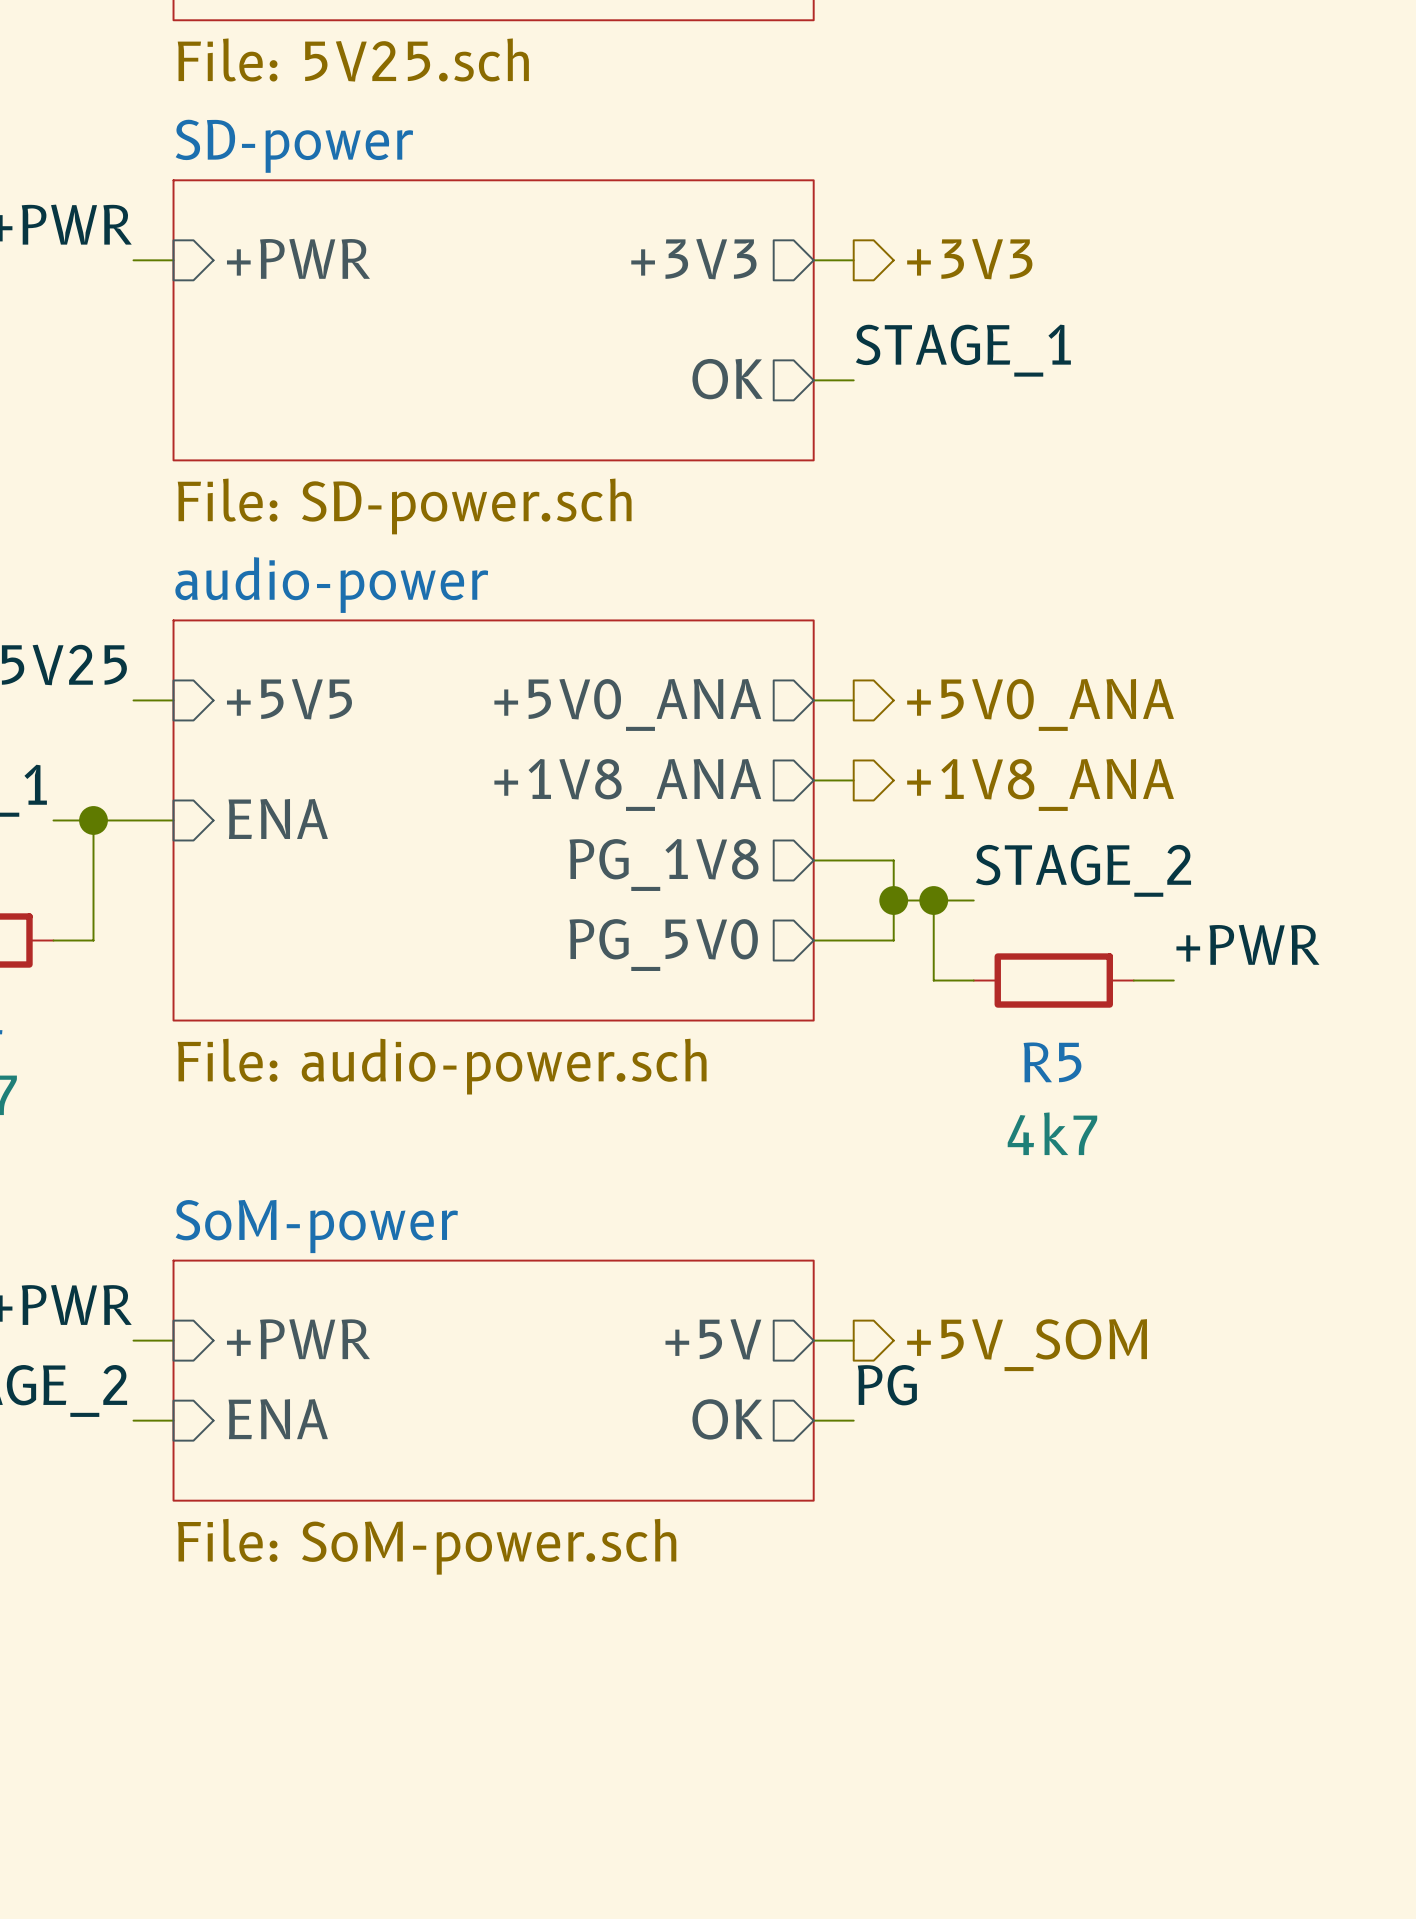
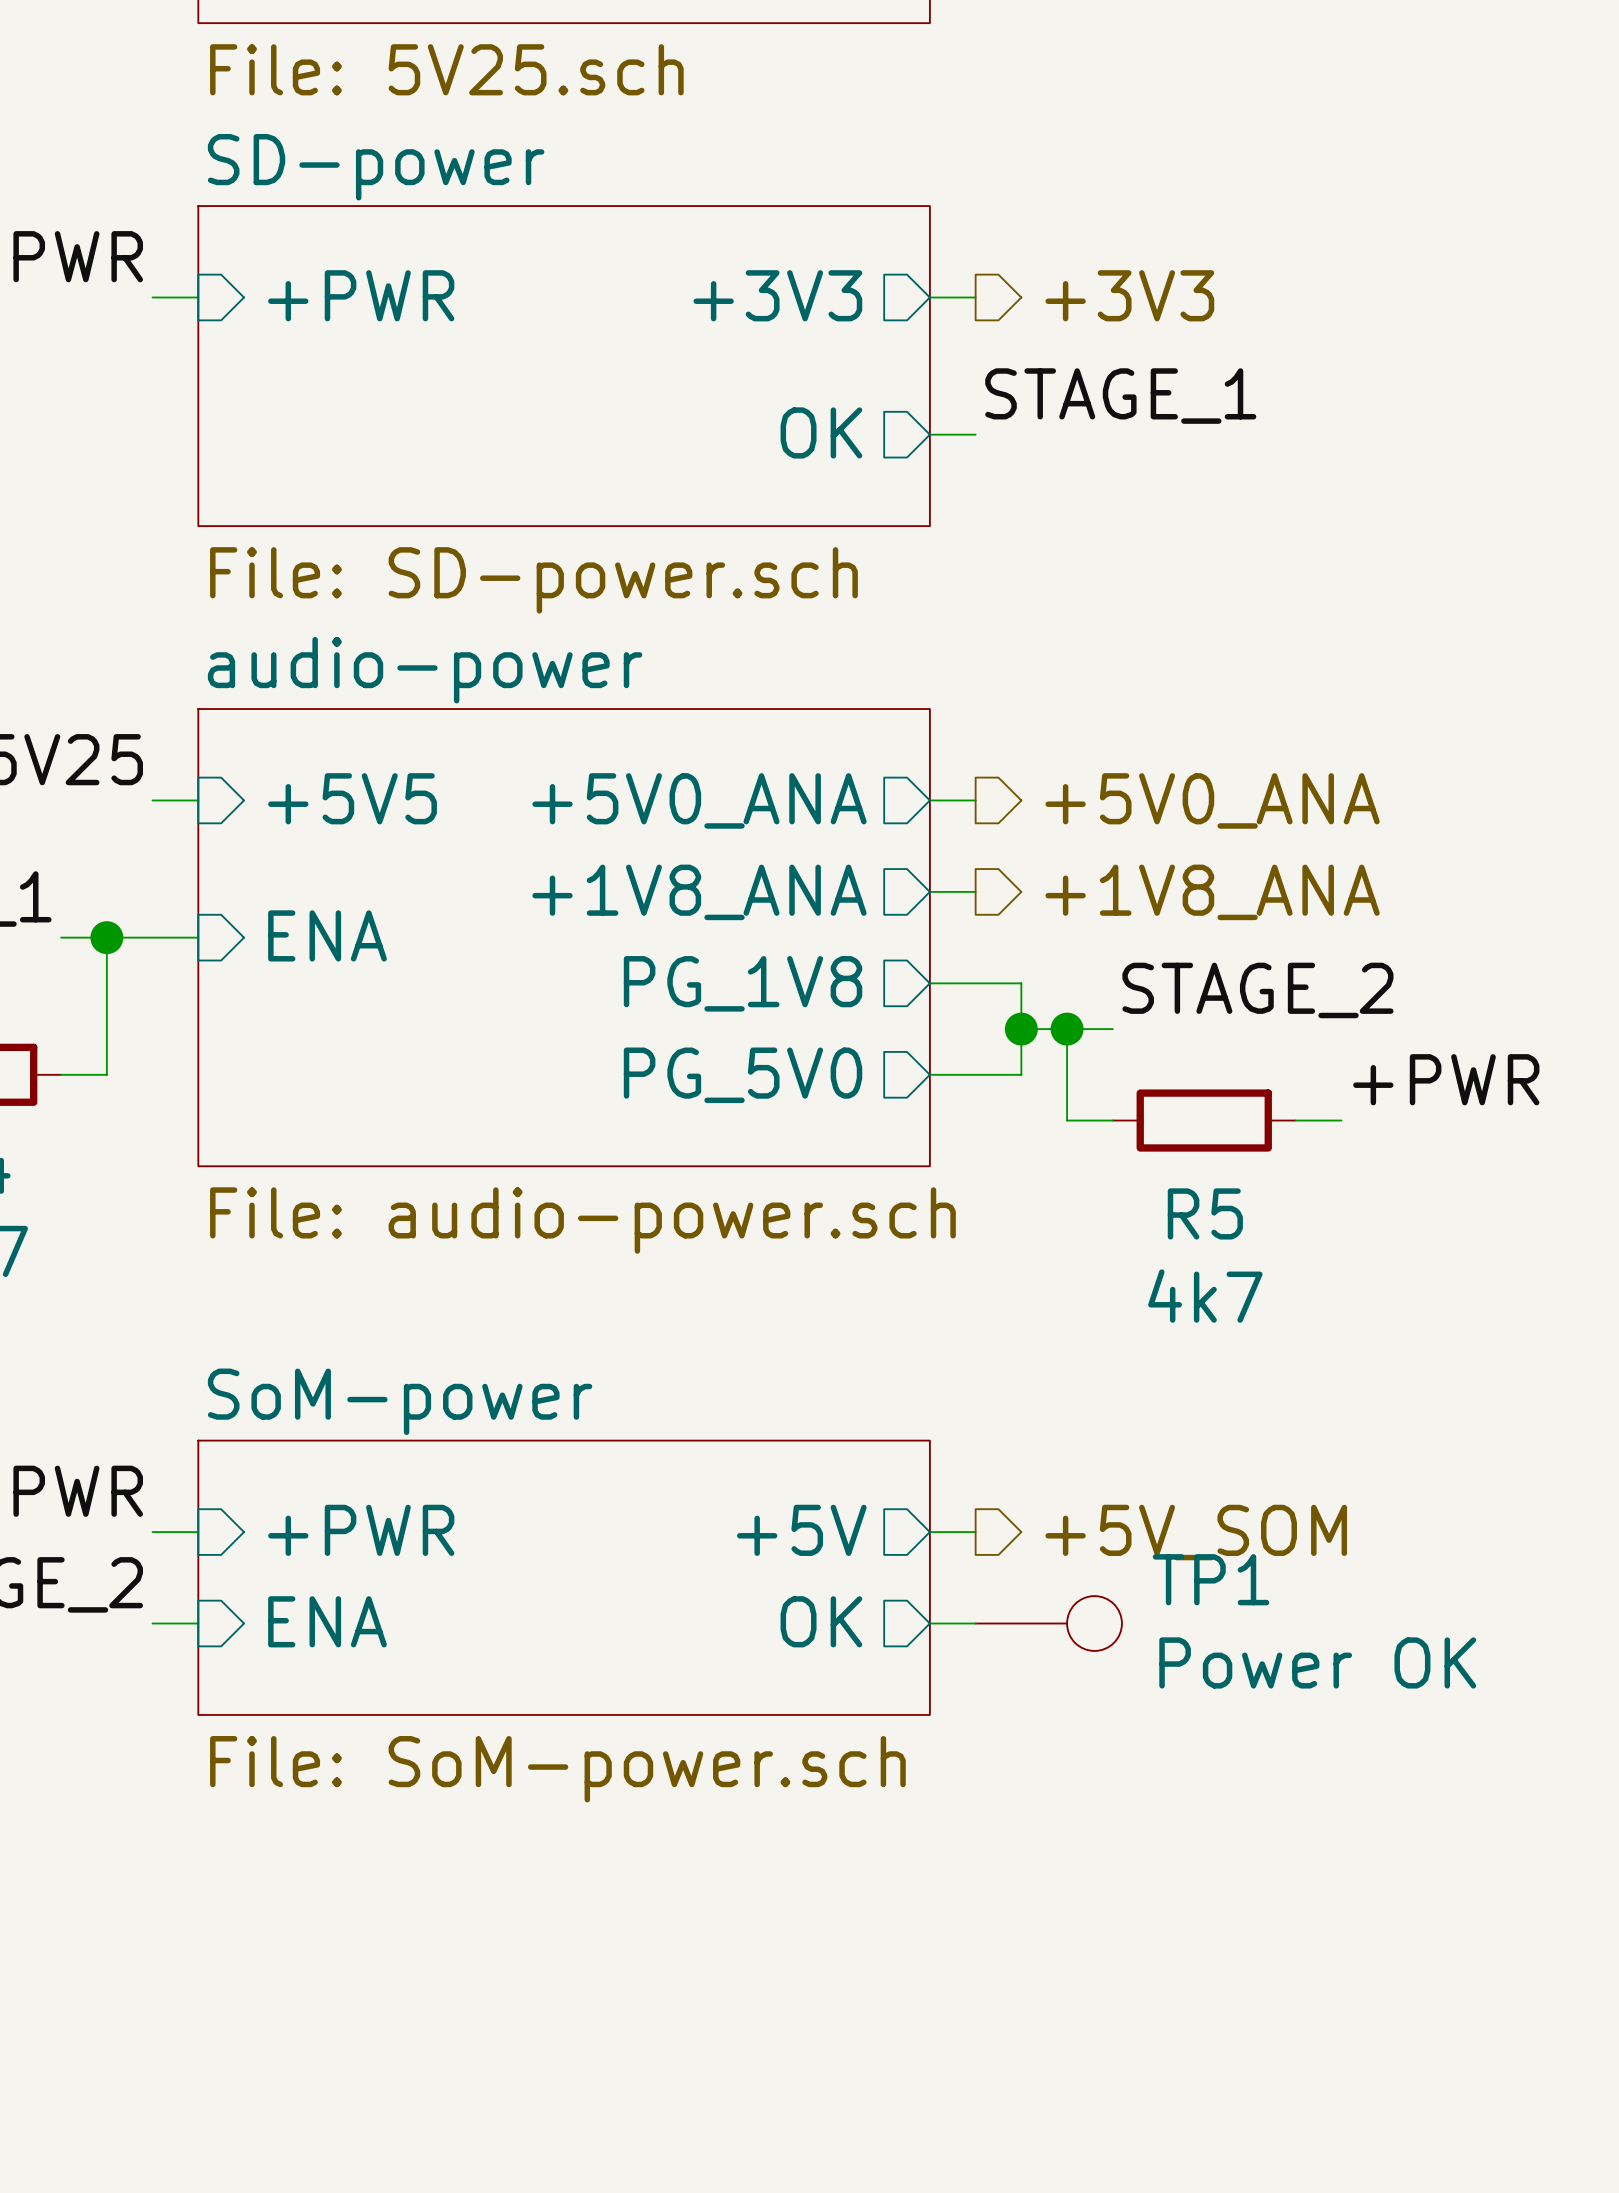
label: PG (887, 1385) -> none
TP1: none -> Power OK (1048, 1623)

